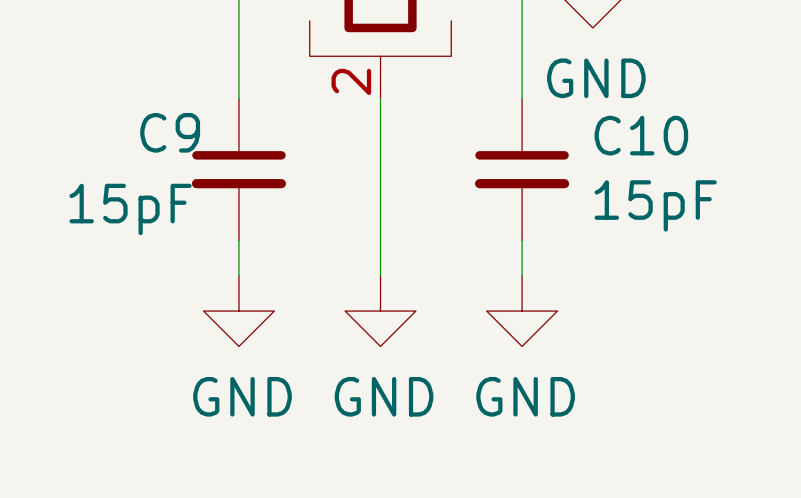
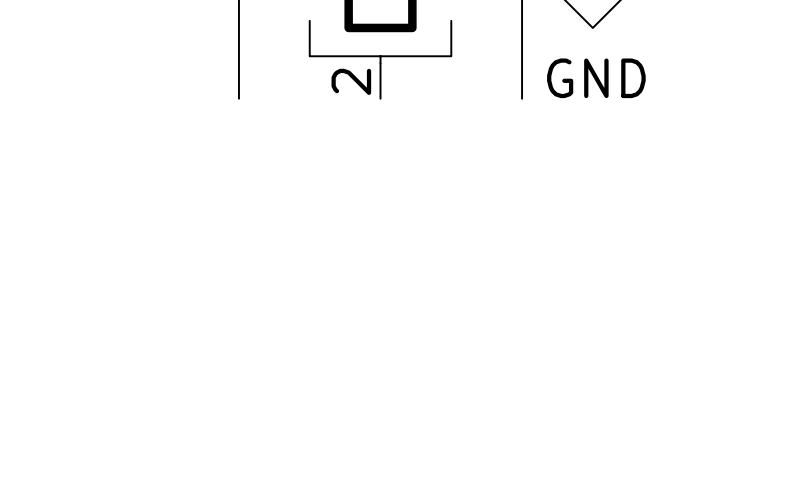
wire: (380, 98) (380, 275) -> none
C9: 15pF (238, 169) -> none
C10: 15pF (522, 169) -> none
wire: (238, 240) (238, 275) -> none
wire: (522, 240) (522, 275) -> none
power symbol: GND (238, 311) -> none
power symbol: GND (380, 311) -> none
power symbol: GND (522, 311) -> none

